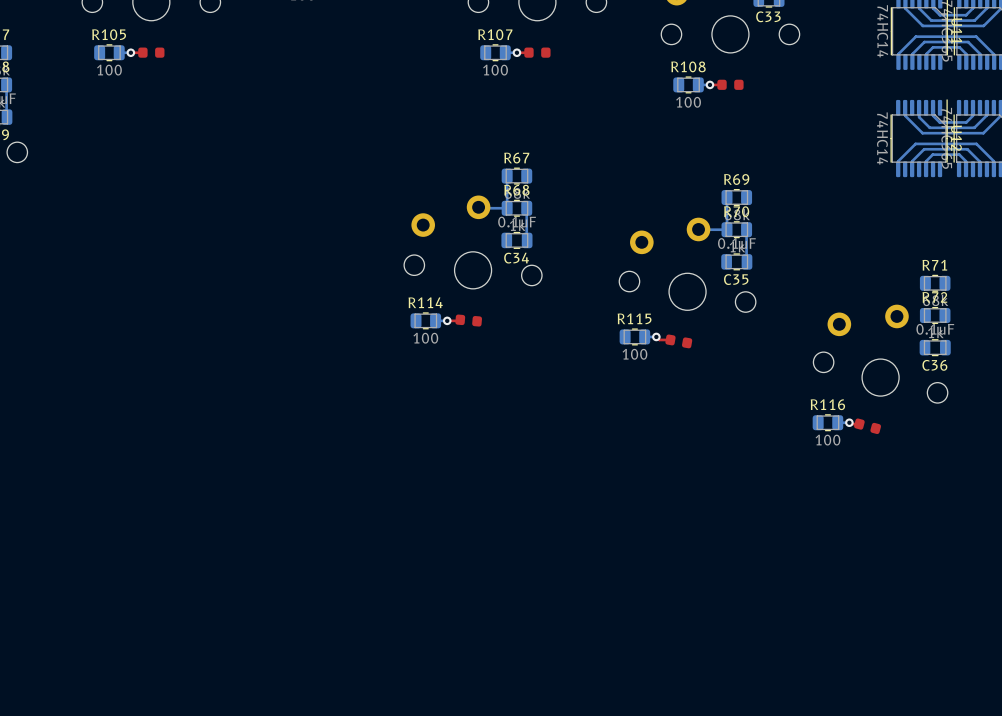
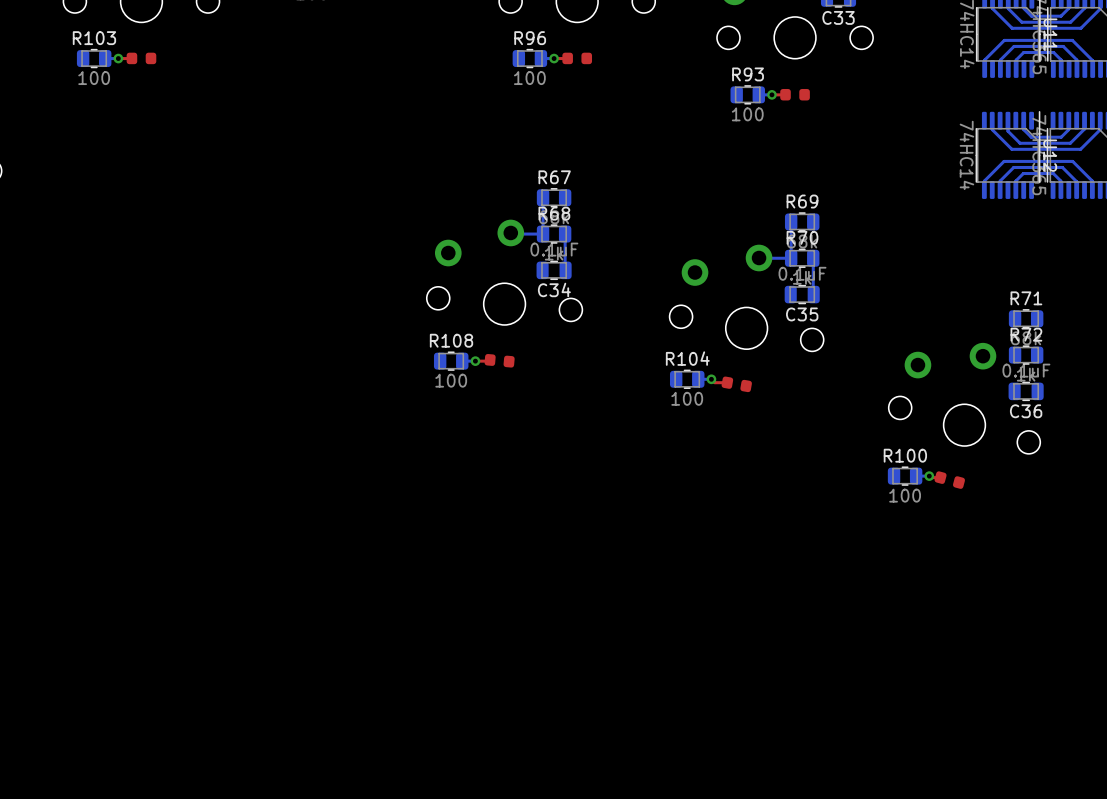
R105 name: R105 (109, 34) -> R103 (94, 38)
R107 name: R107 (495, 34) -> R96 (530, 38)
R108 name: R108 (688, 66) -> R93 (748, 74)
R114 name: R114 (425, 302) -> R108 (451, 340)
R115 name: R115 (634, 318) -> R104 (687, 358)
R116 name: R116 (827, 404) -> R100 (905, 455)

